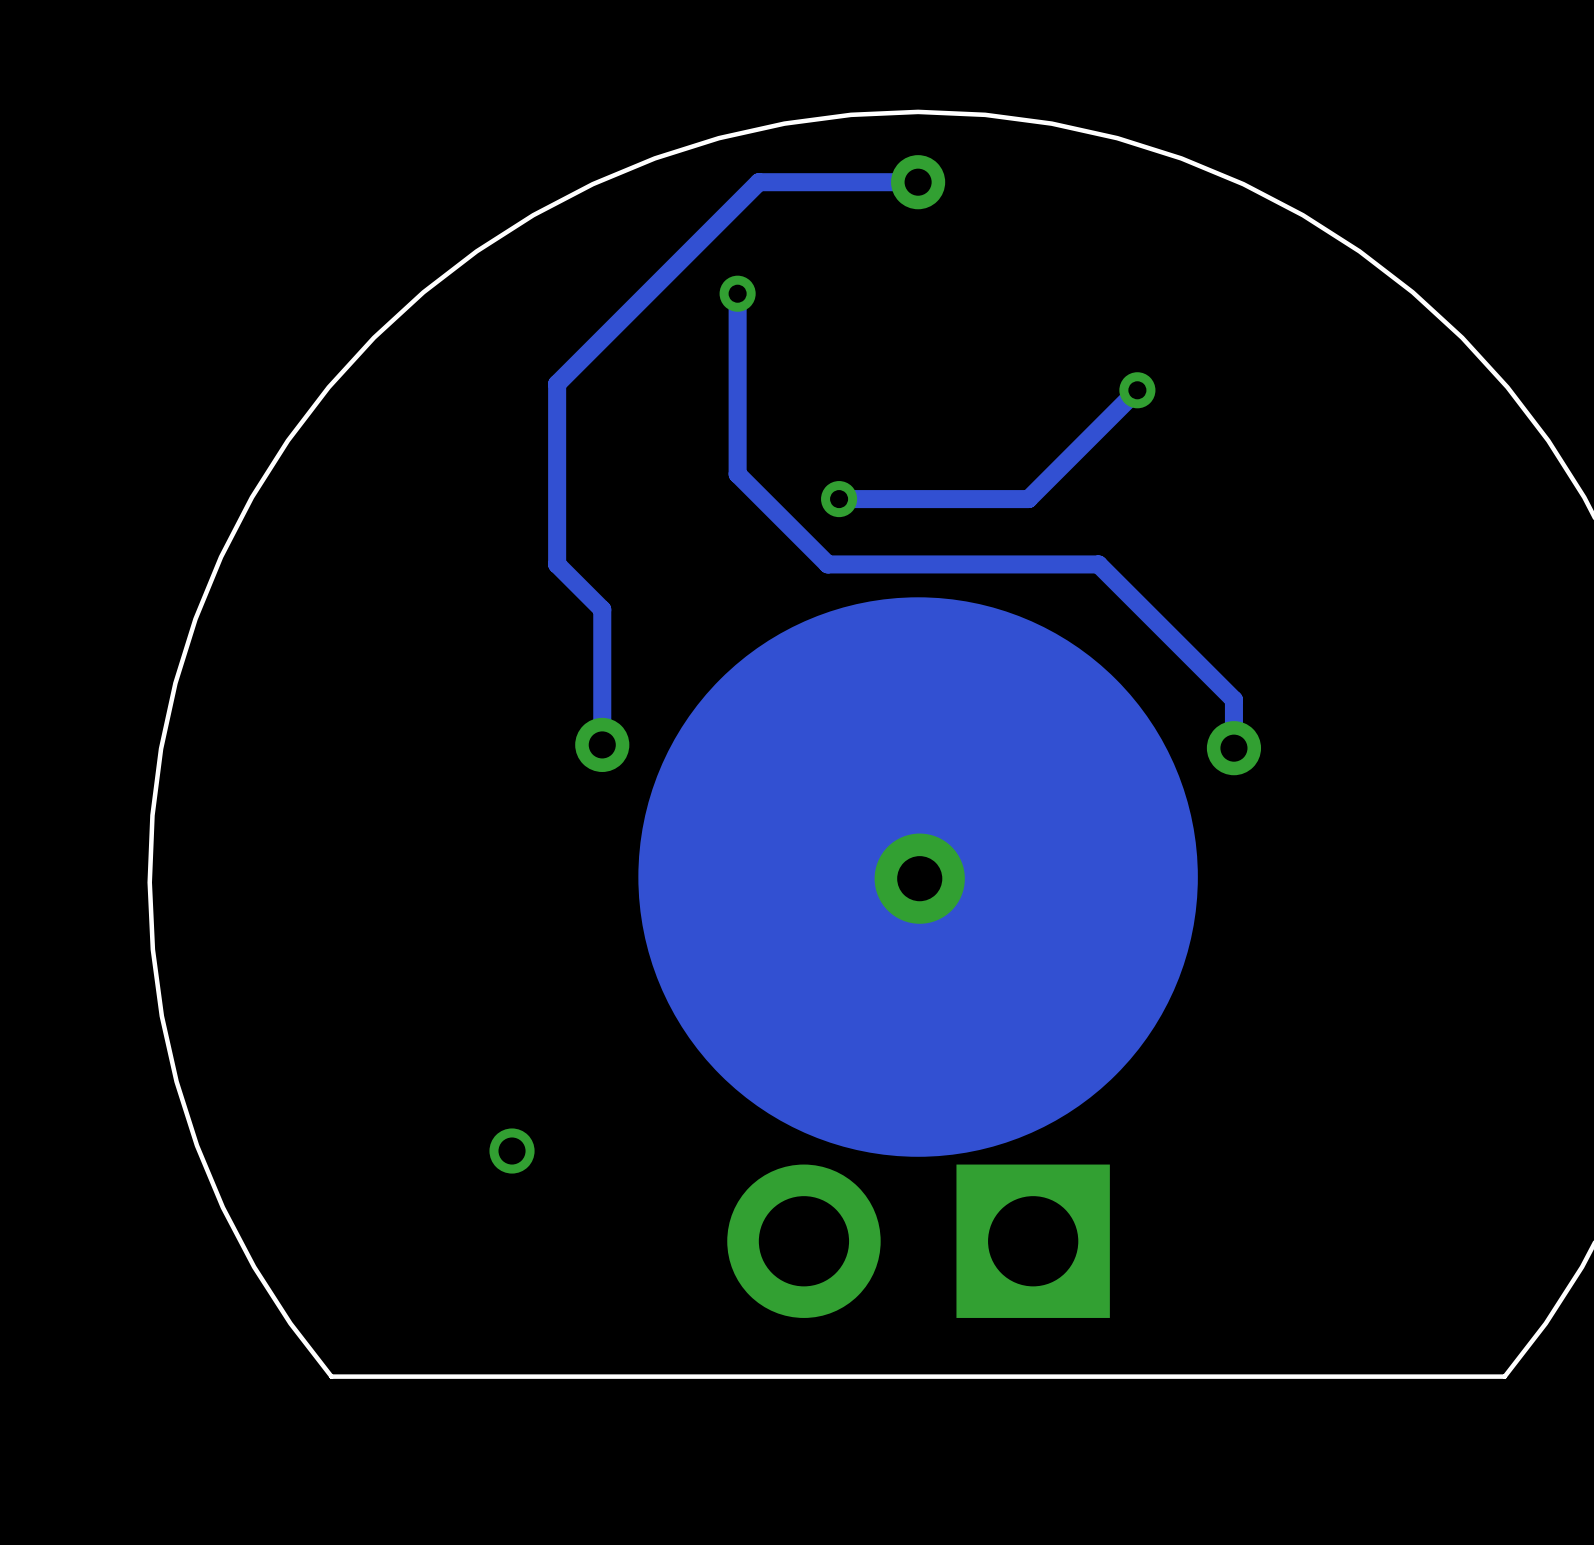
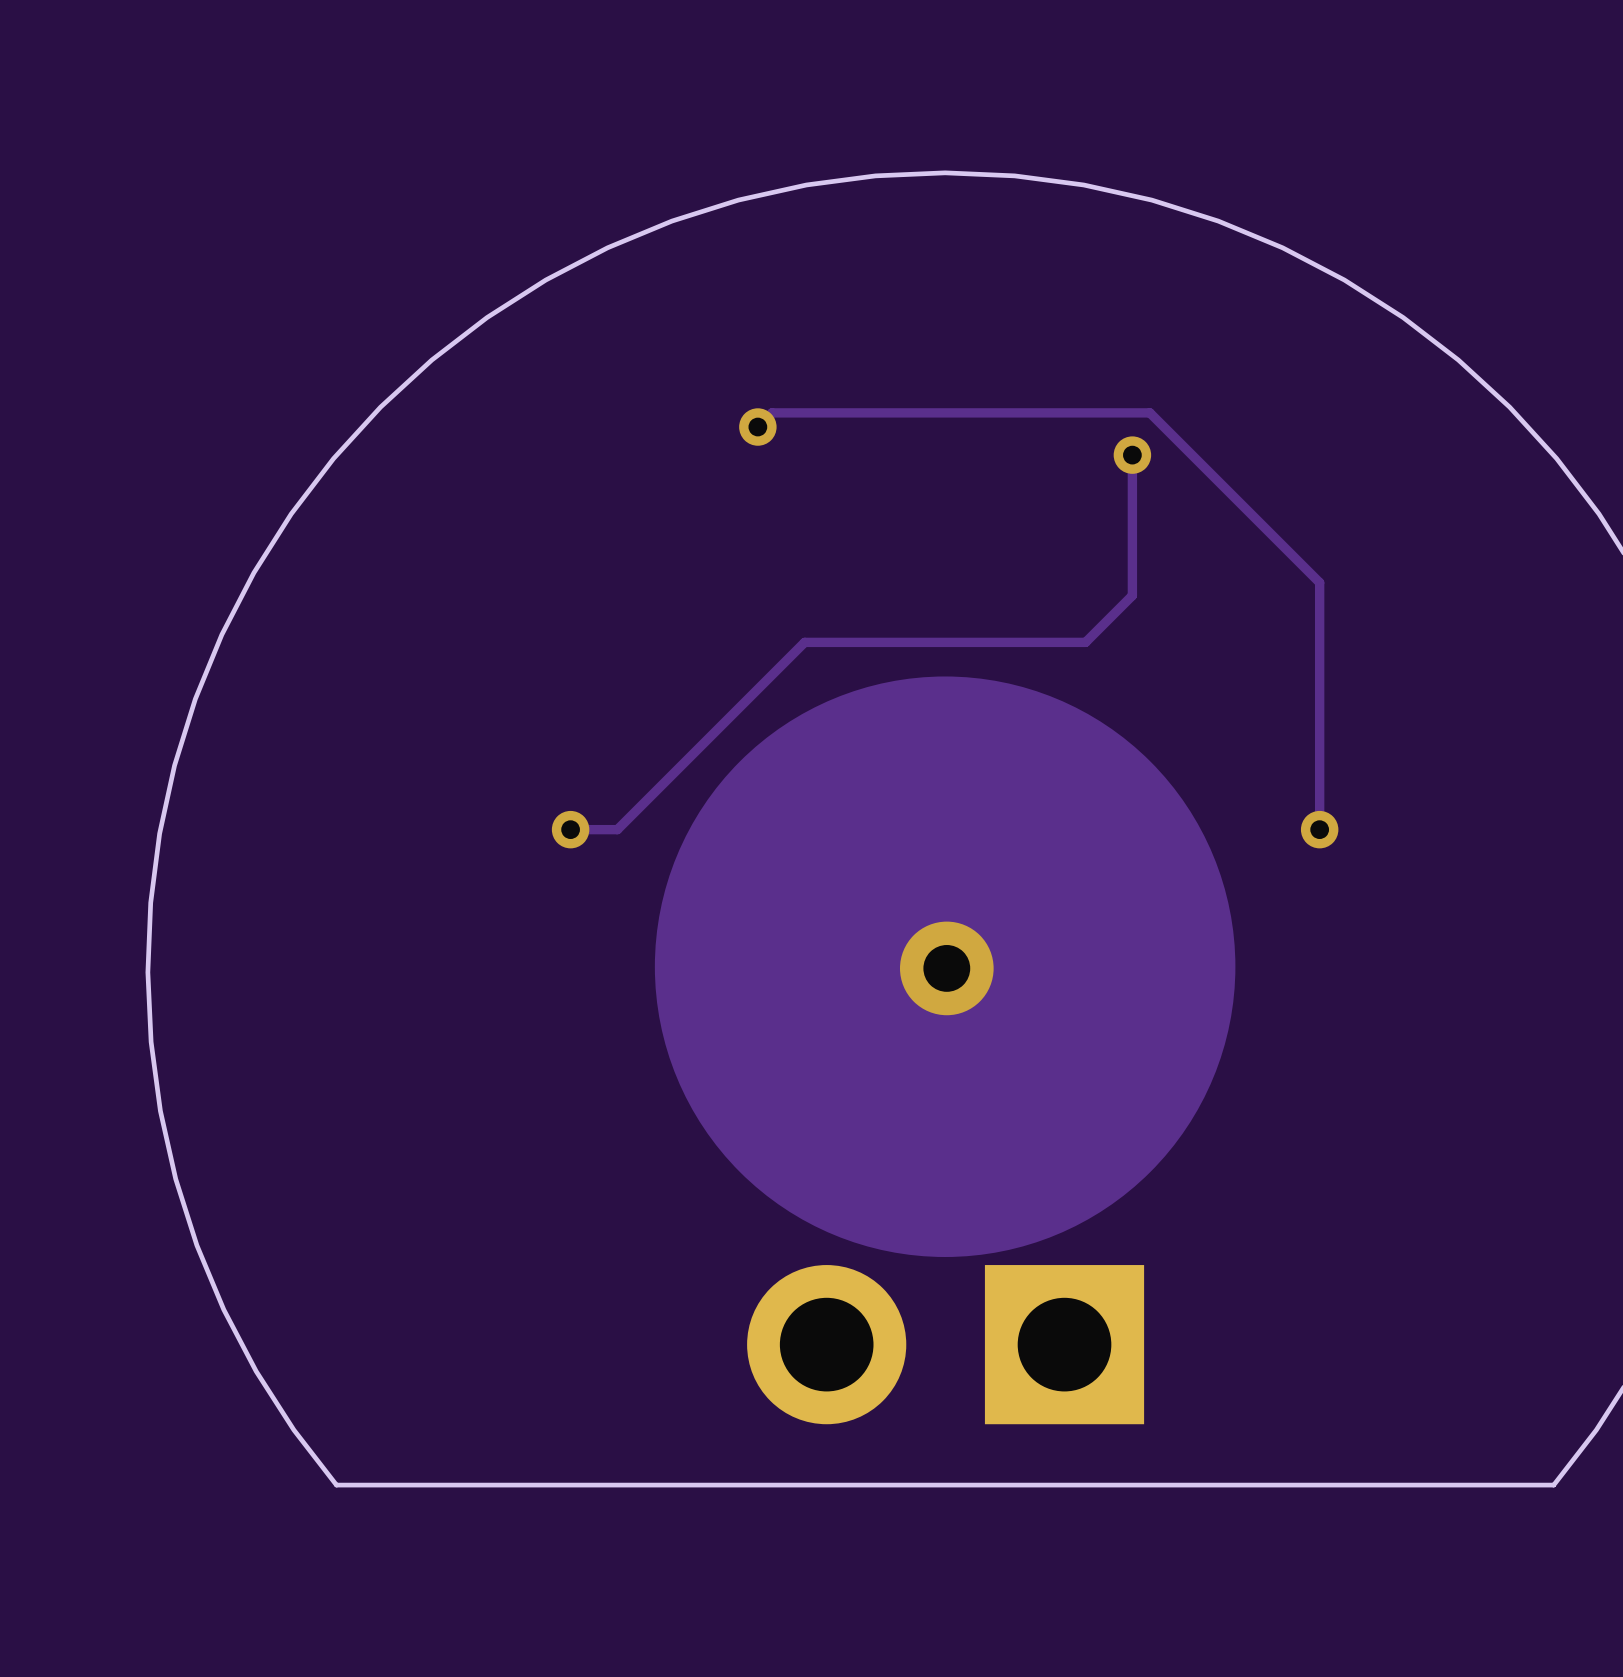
track: (918, 182) (758, 182) (557, 383) (557, 564) (602, 609) (602, 744) -> none
via: (918, 182) -> none
track: (737, 293) (737, 474) (827, 564) -> (570, 829) (617, 829) (804, 642) (851, 642)
via position: (737, 293) -> (757, 427)
track: none -> (757, 427) (772, 412) (1149, 412) (1319, 582) (1319, 829)
track: (1137, 390) (1028, 499) (839, 499) -> none
via position: (1137, 390) -> (1132, 455)
via: (839, 499) -> none
track: (1053, 564) (1098, 564) (1233, 699) (1233, 748) -> (1085, 642) (1132, 595) (1132, 455)
track width: thick (1053, 564) (827, 564) -> thin (1085, 642) (851, 642)
via position: (602, 744) -> (570, 829)
via position: (1233, 748) -> (1319, 829)
via: (512, 1151) -> none

